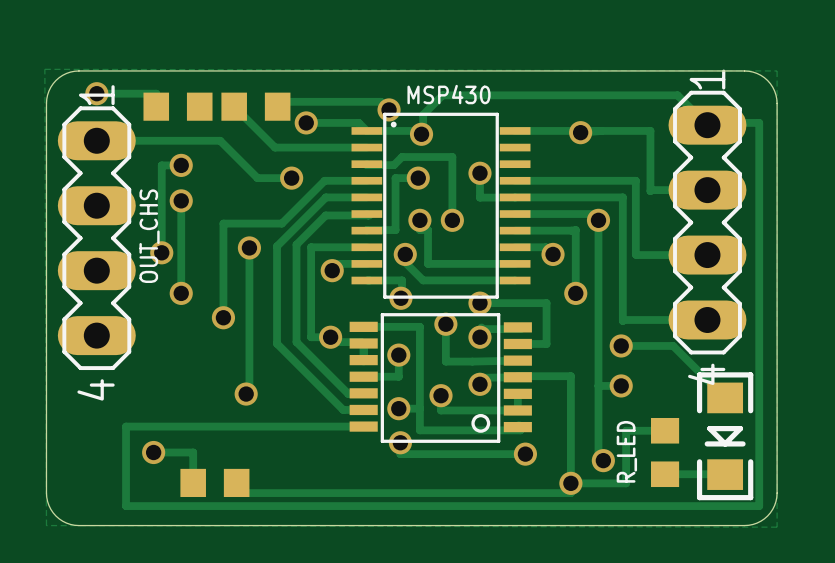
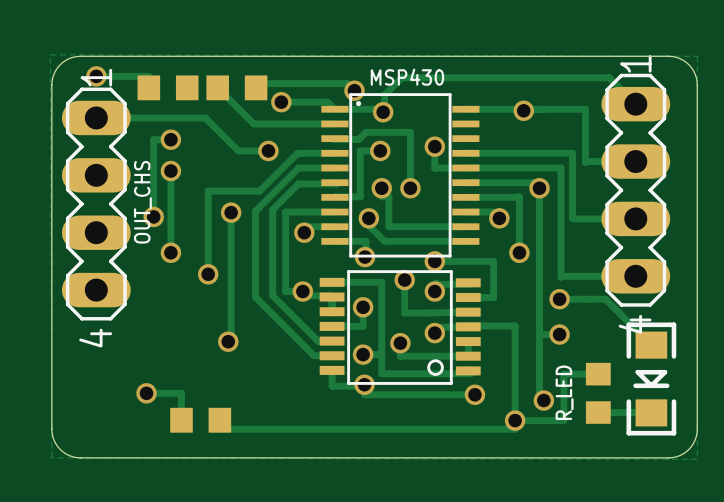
track: (707, 125) (705, 122) (759, 122) (759, 506) (126, 506) (126, 426) (363, 426) -> (364, 386) (332, 386) (332, 370)

